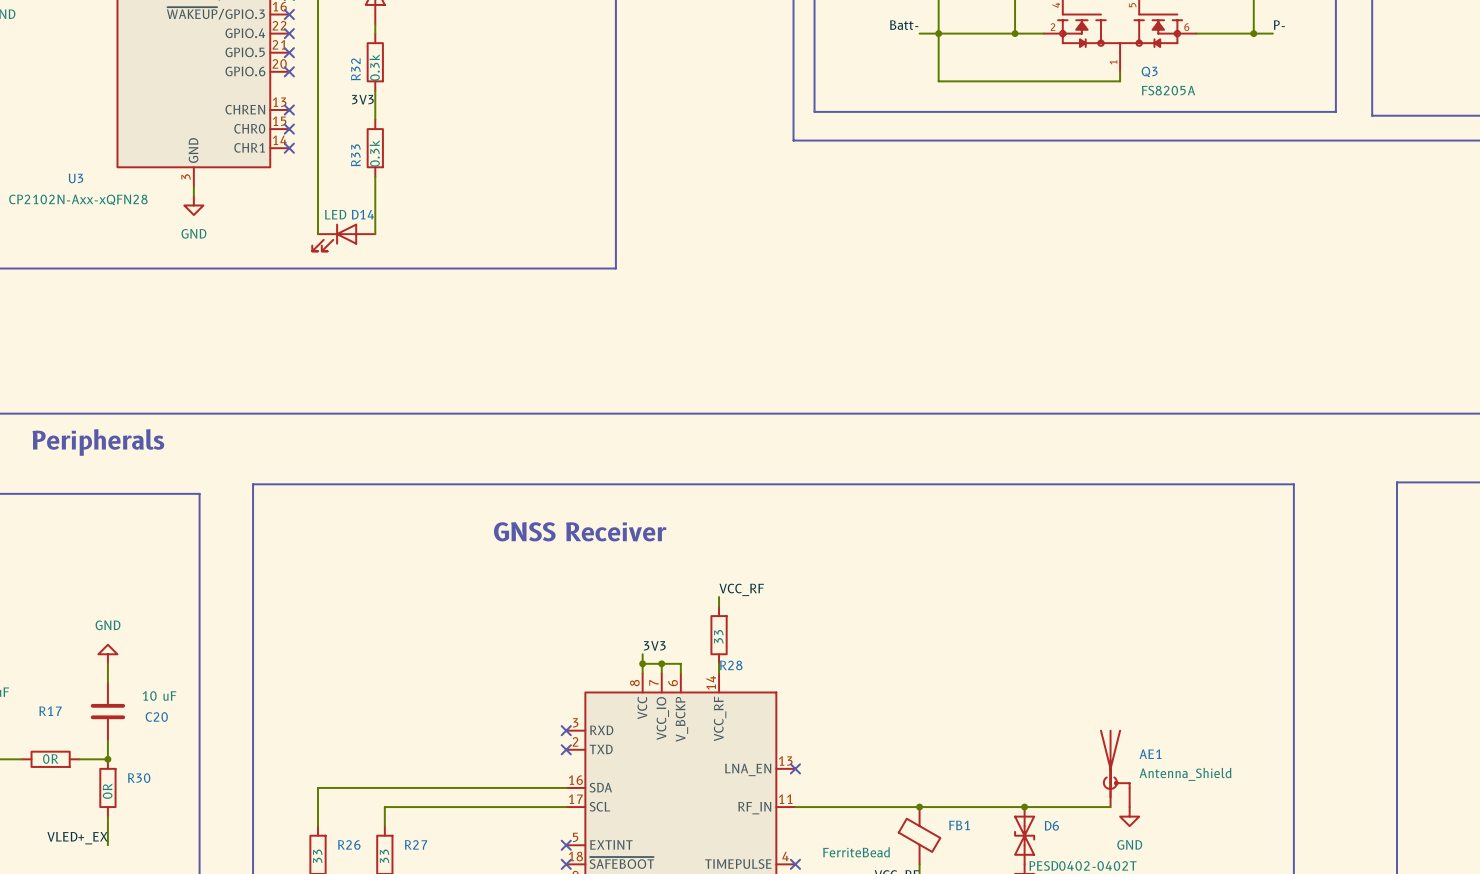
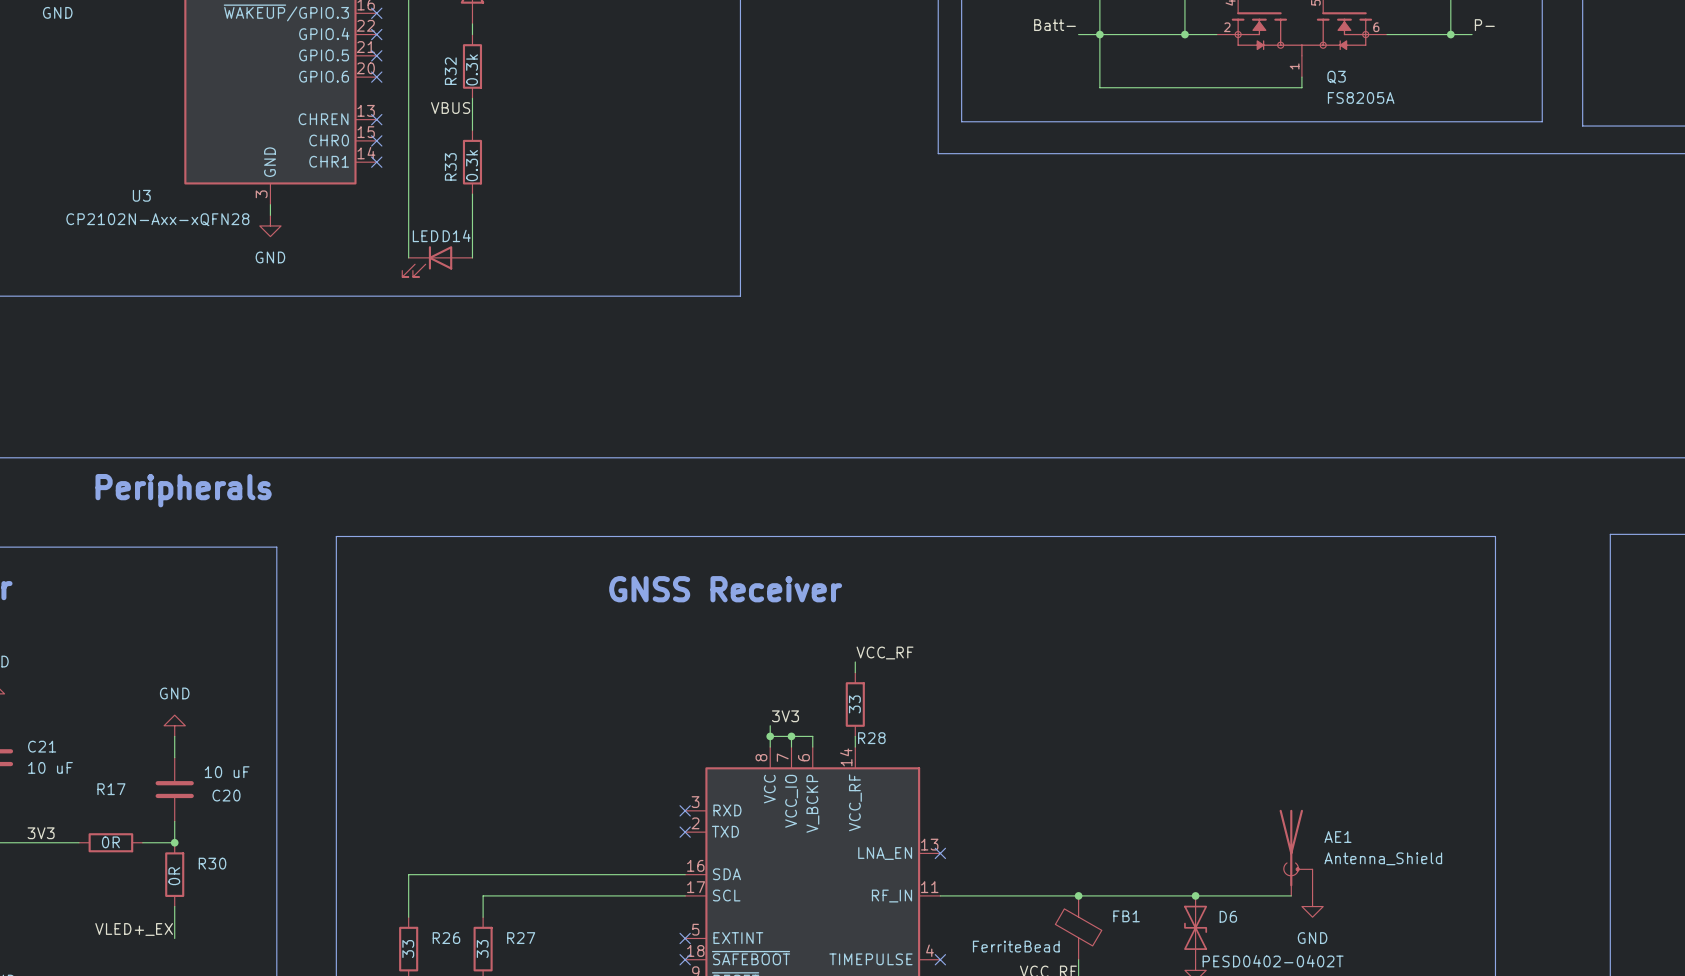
label: 3V3 (362, 99) -> VBUS (450, 108)

